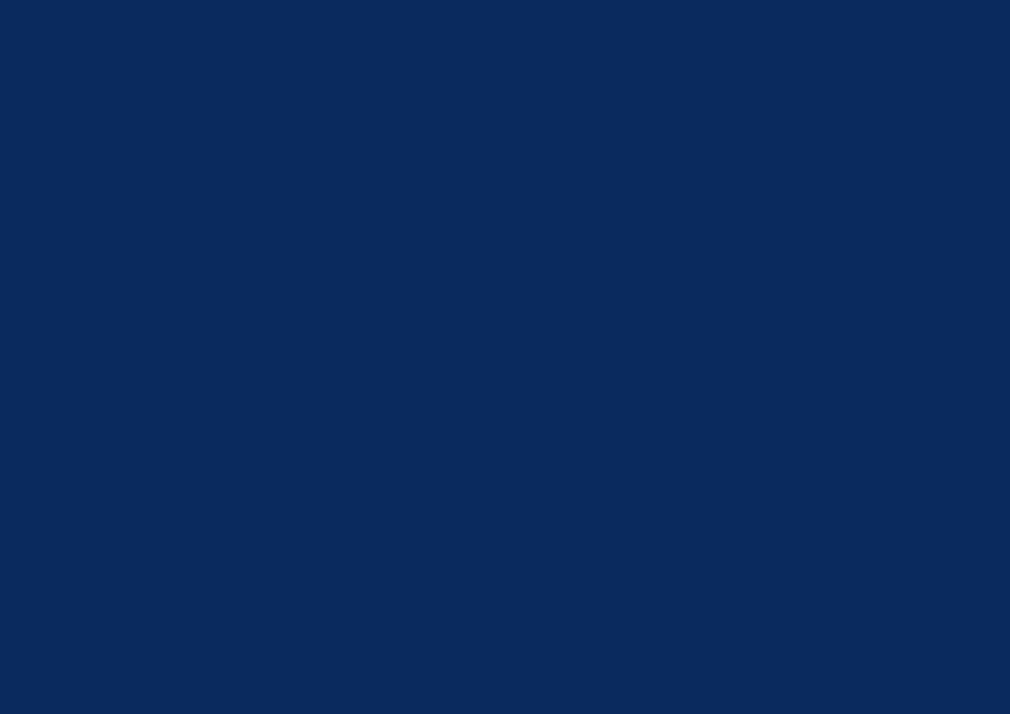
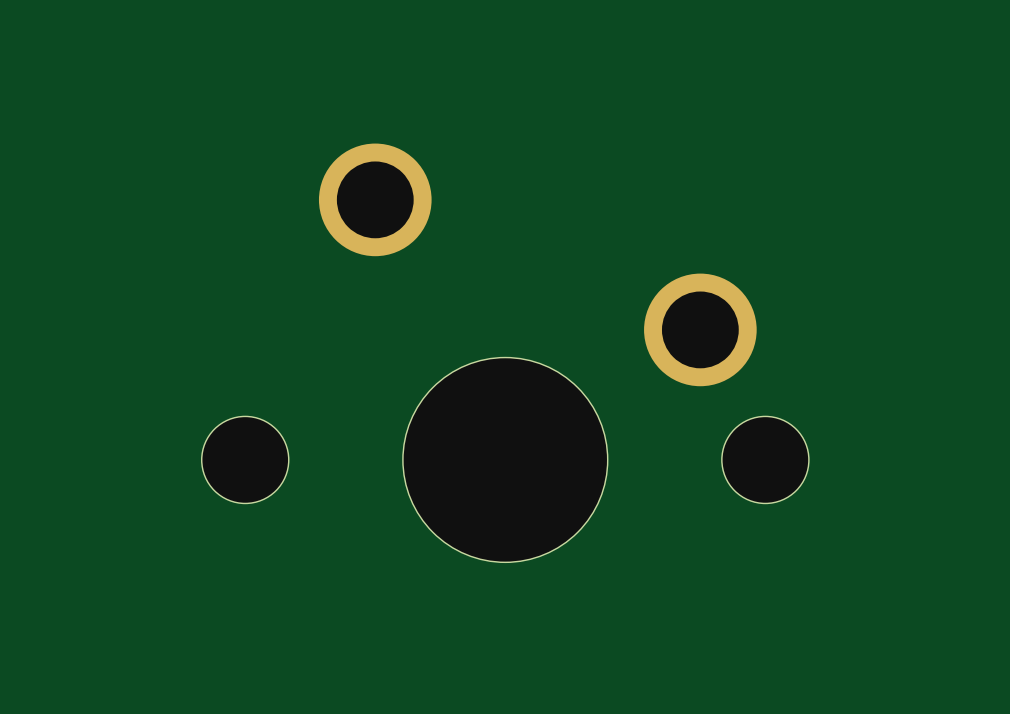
part: none -> (505, 352)

